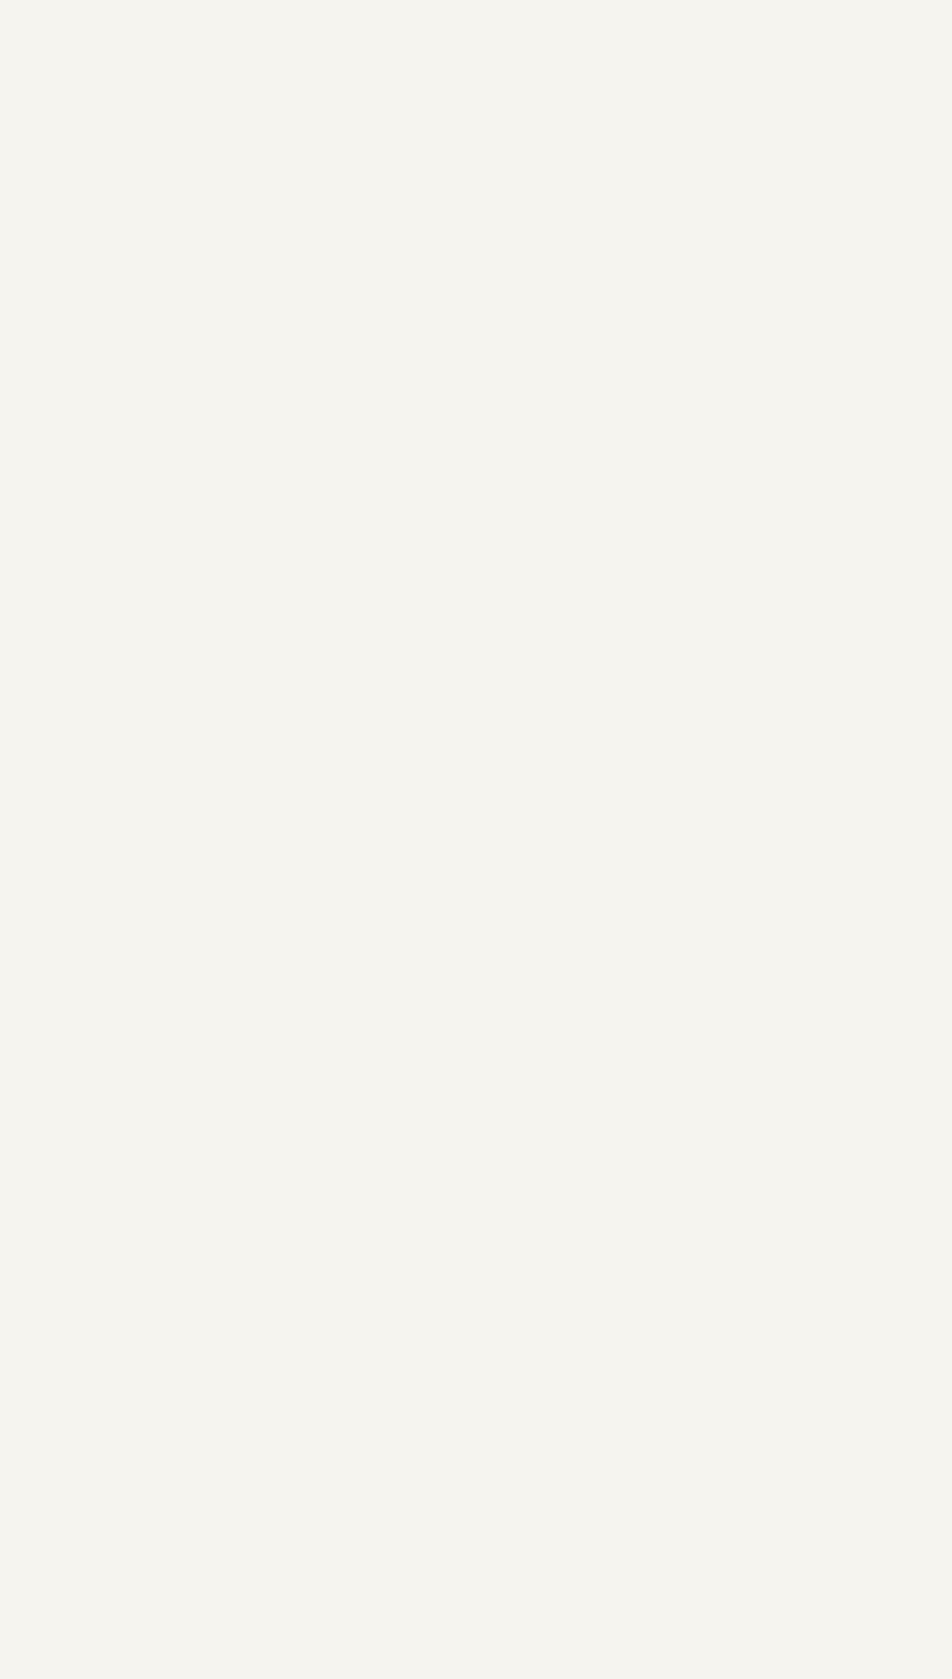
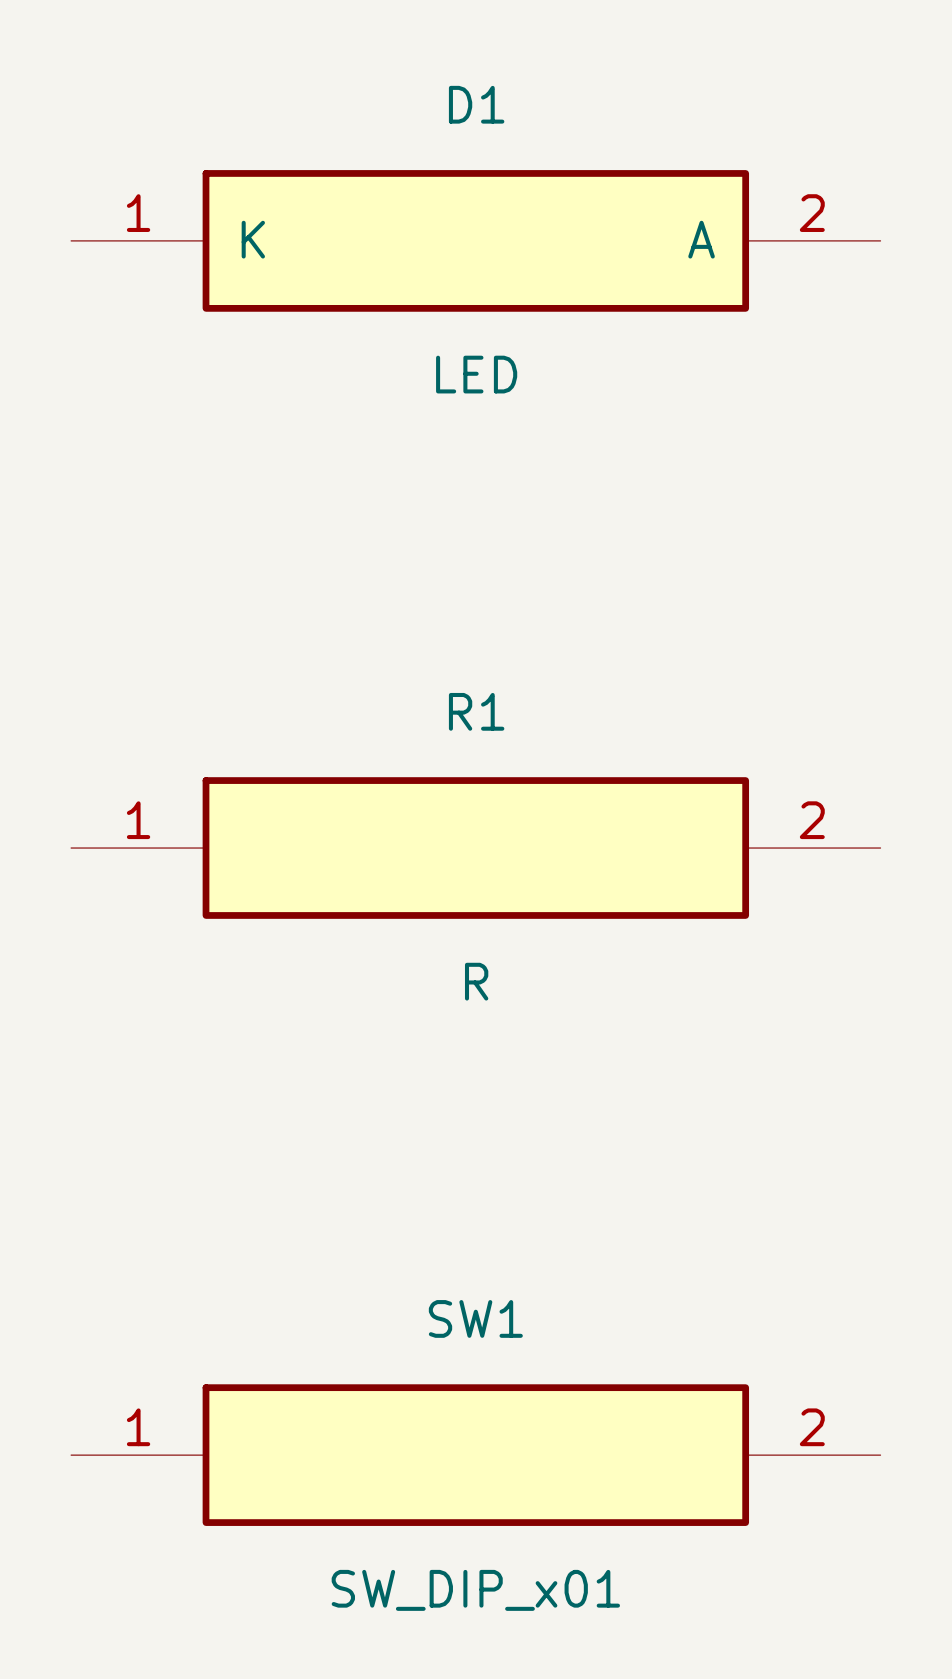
D1: none -> LED (475, 240)
R1: none -> R (475, 848)
SW1: none -> SW_DIP_x01 (475, 1455)

